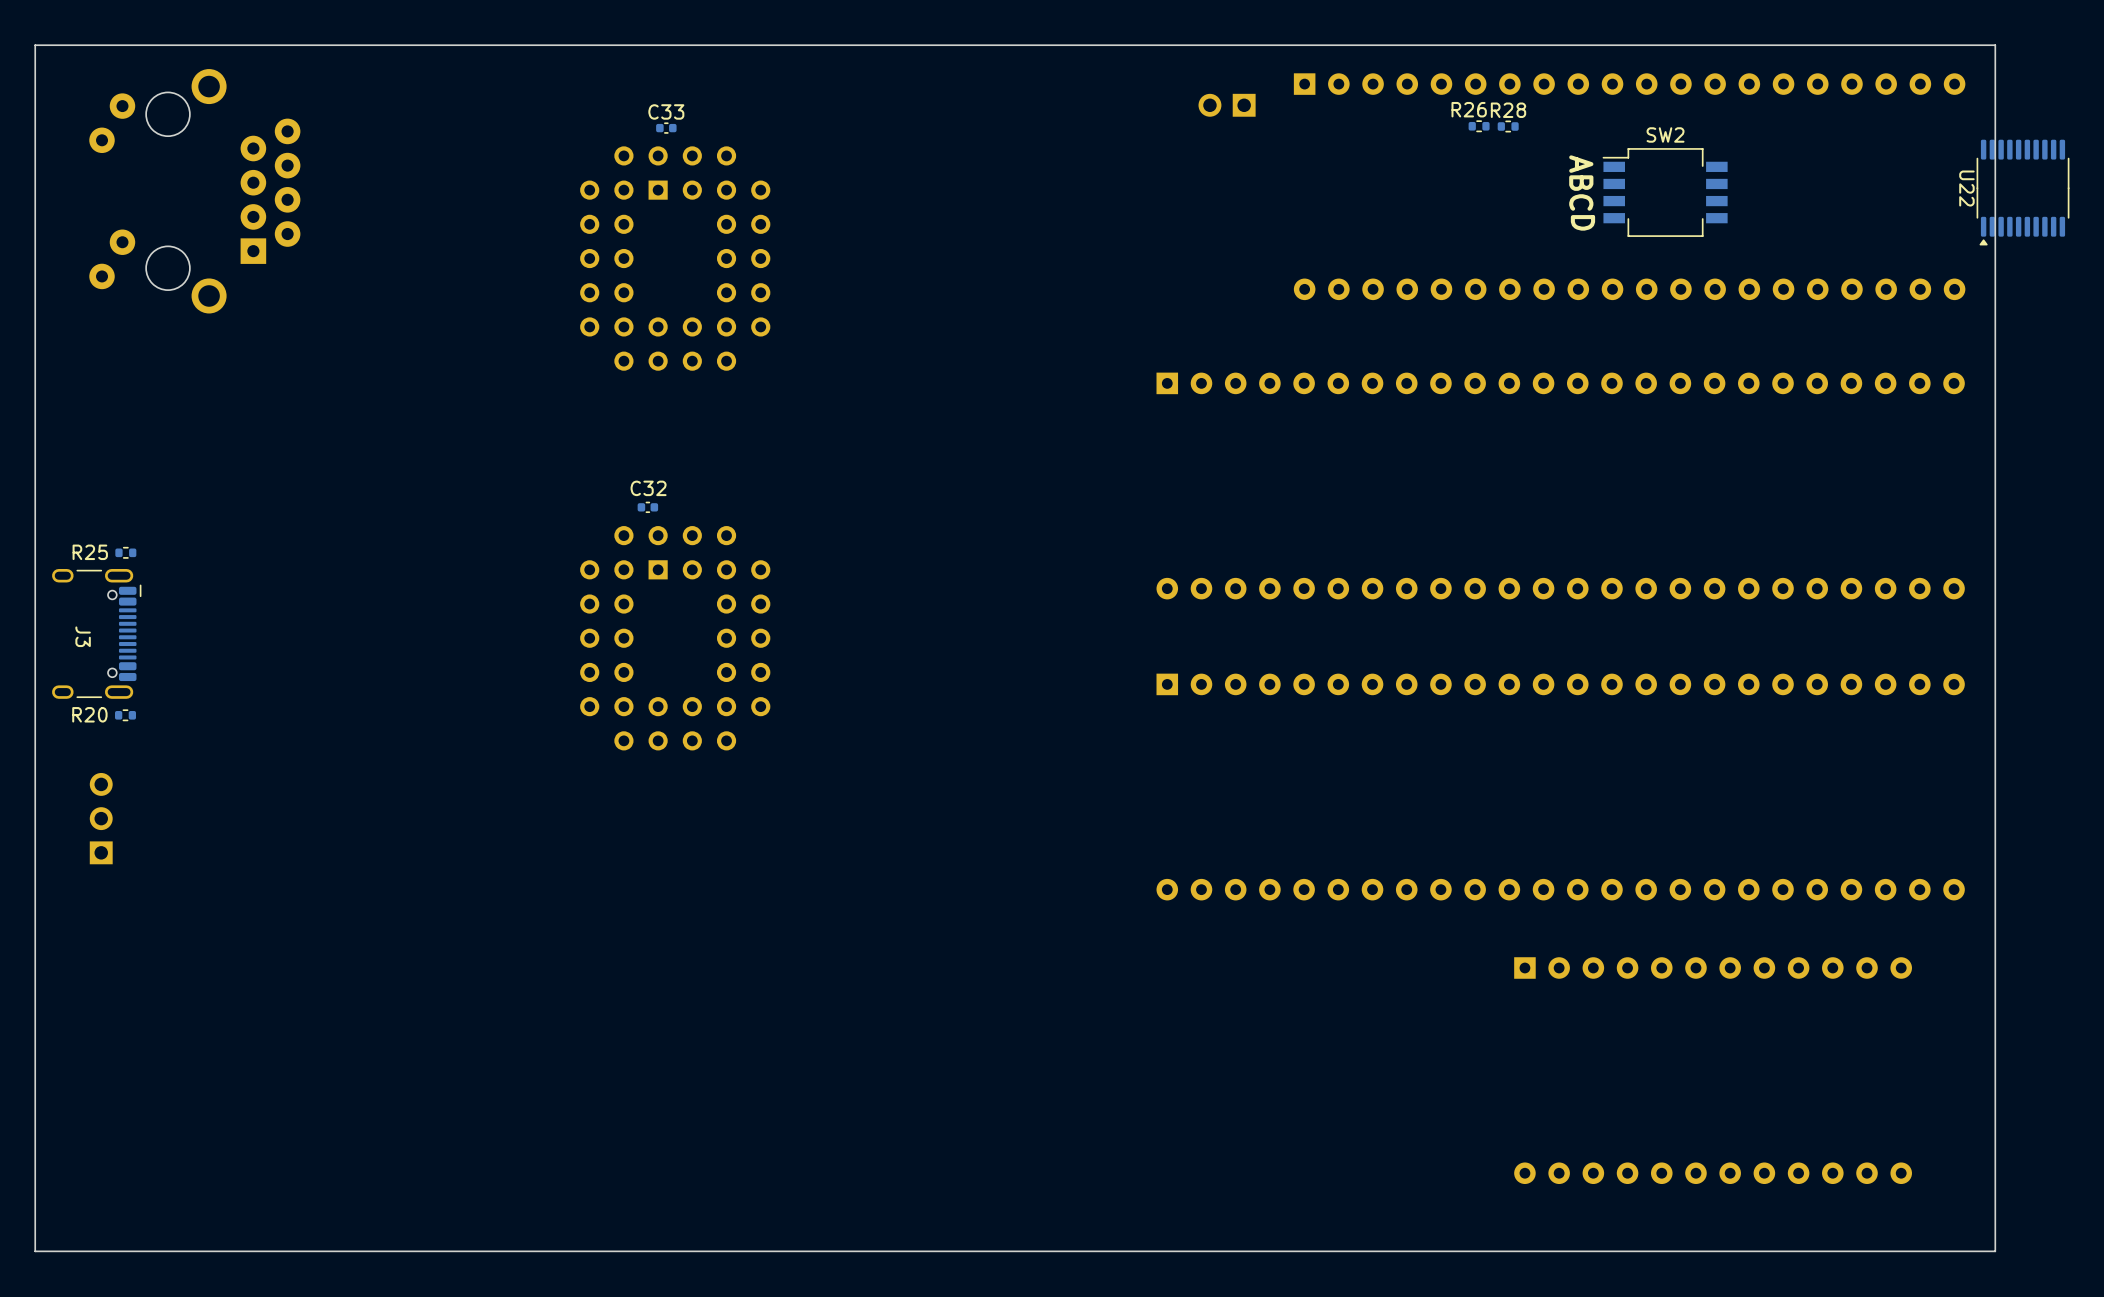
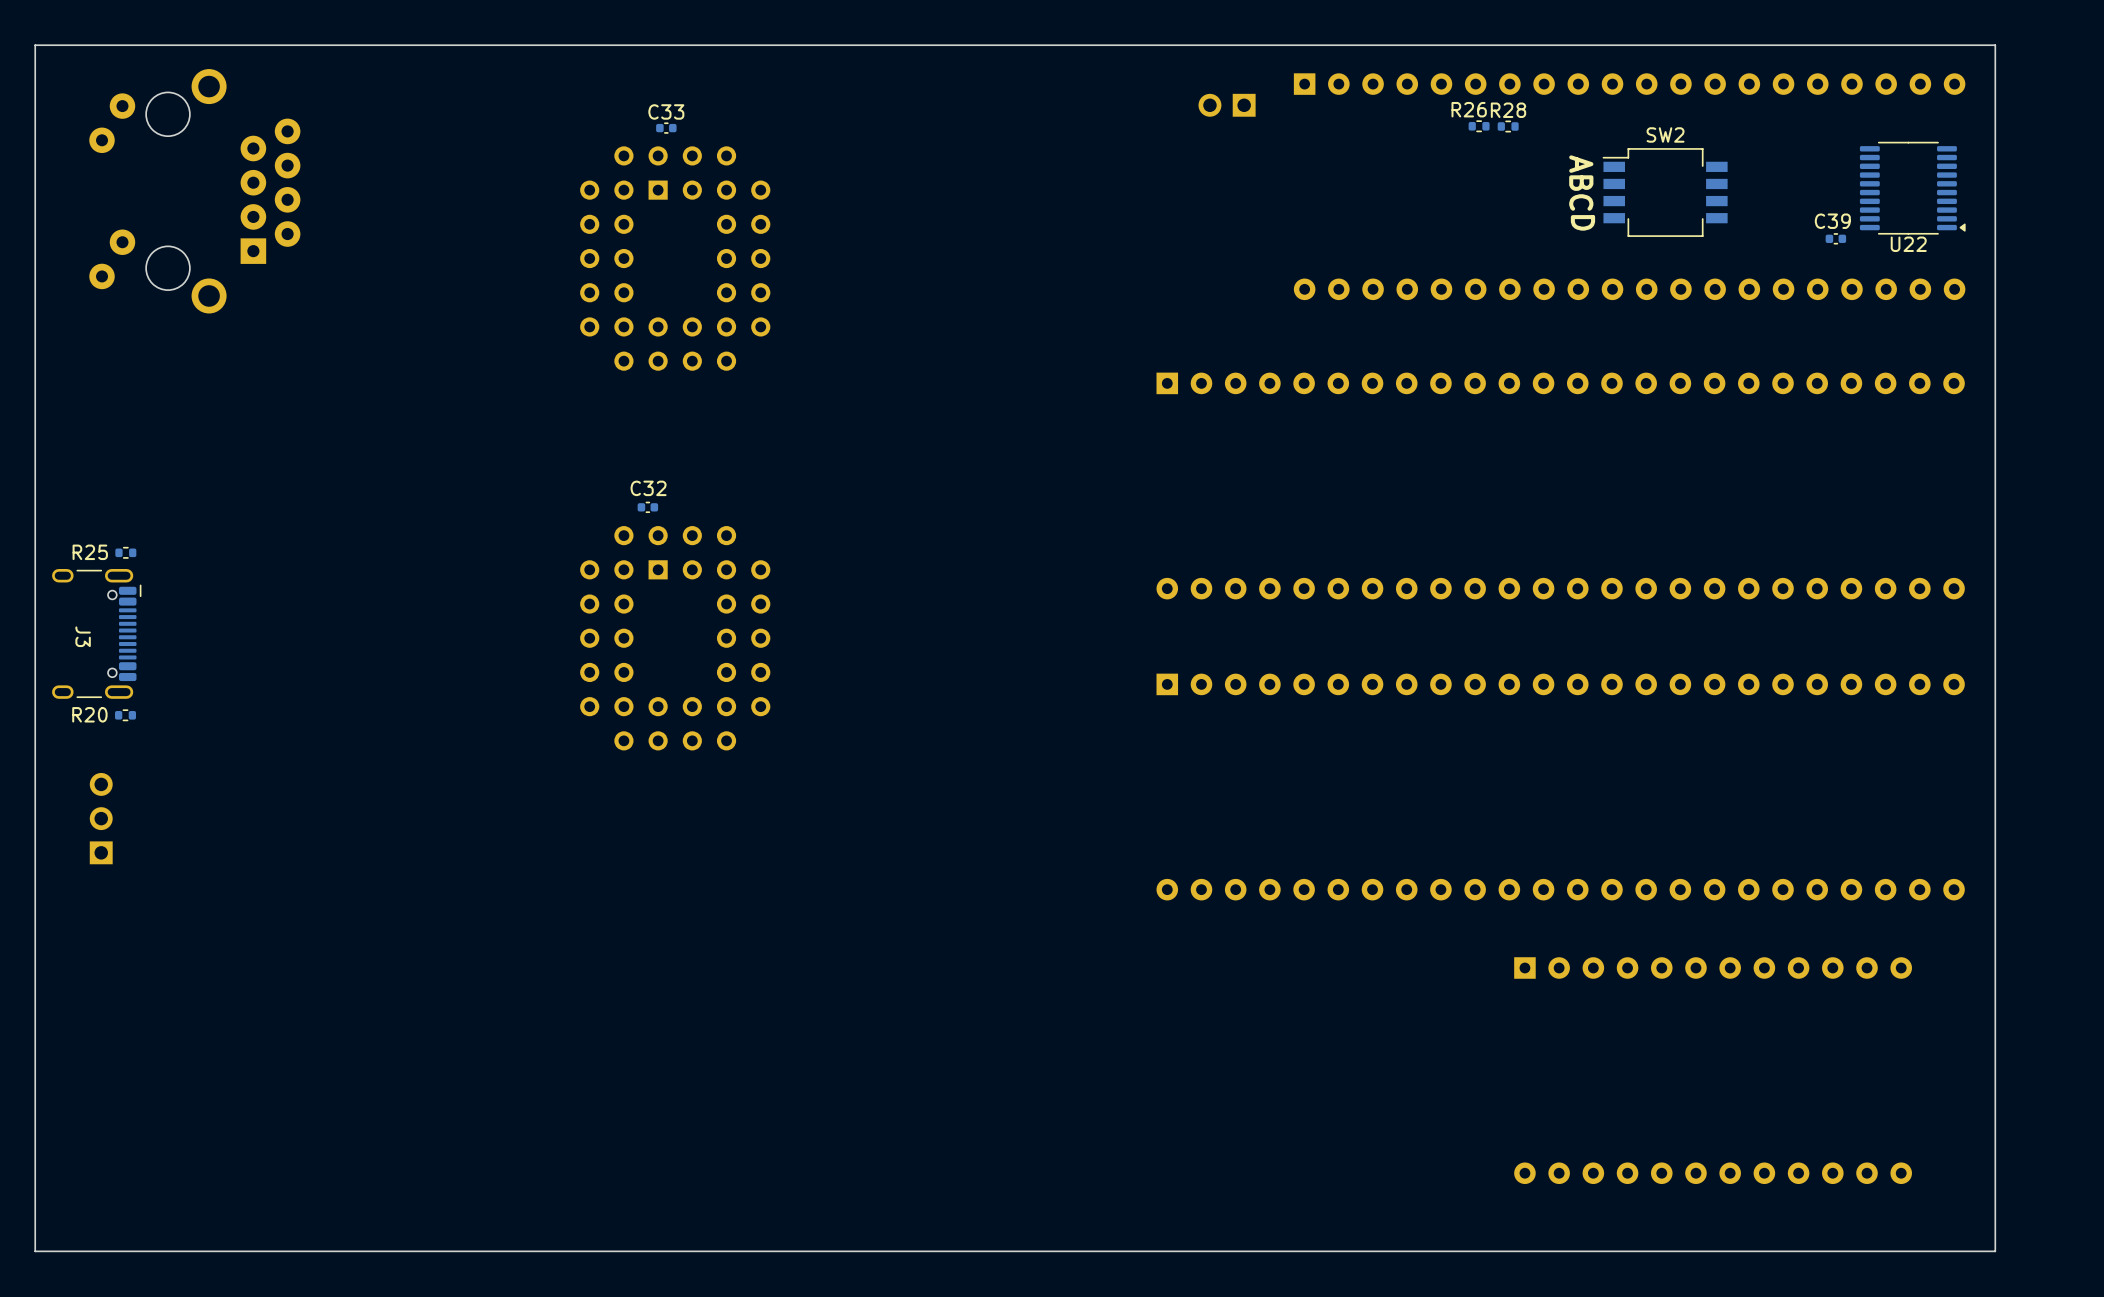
U22 rotation: 0° (2023, 192) -> 90° counterclockwise (1912, 188)
U22 position: (2023, 192) -> (1912, 188)
C39: none -> (1835, 238)

